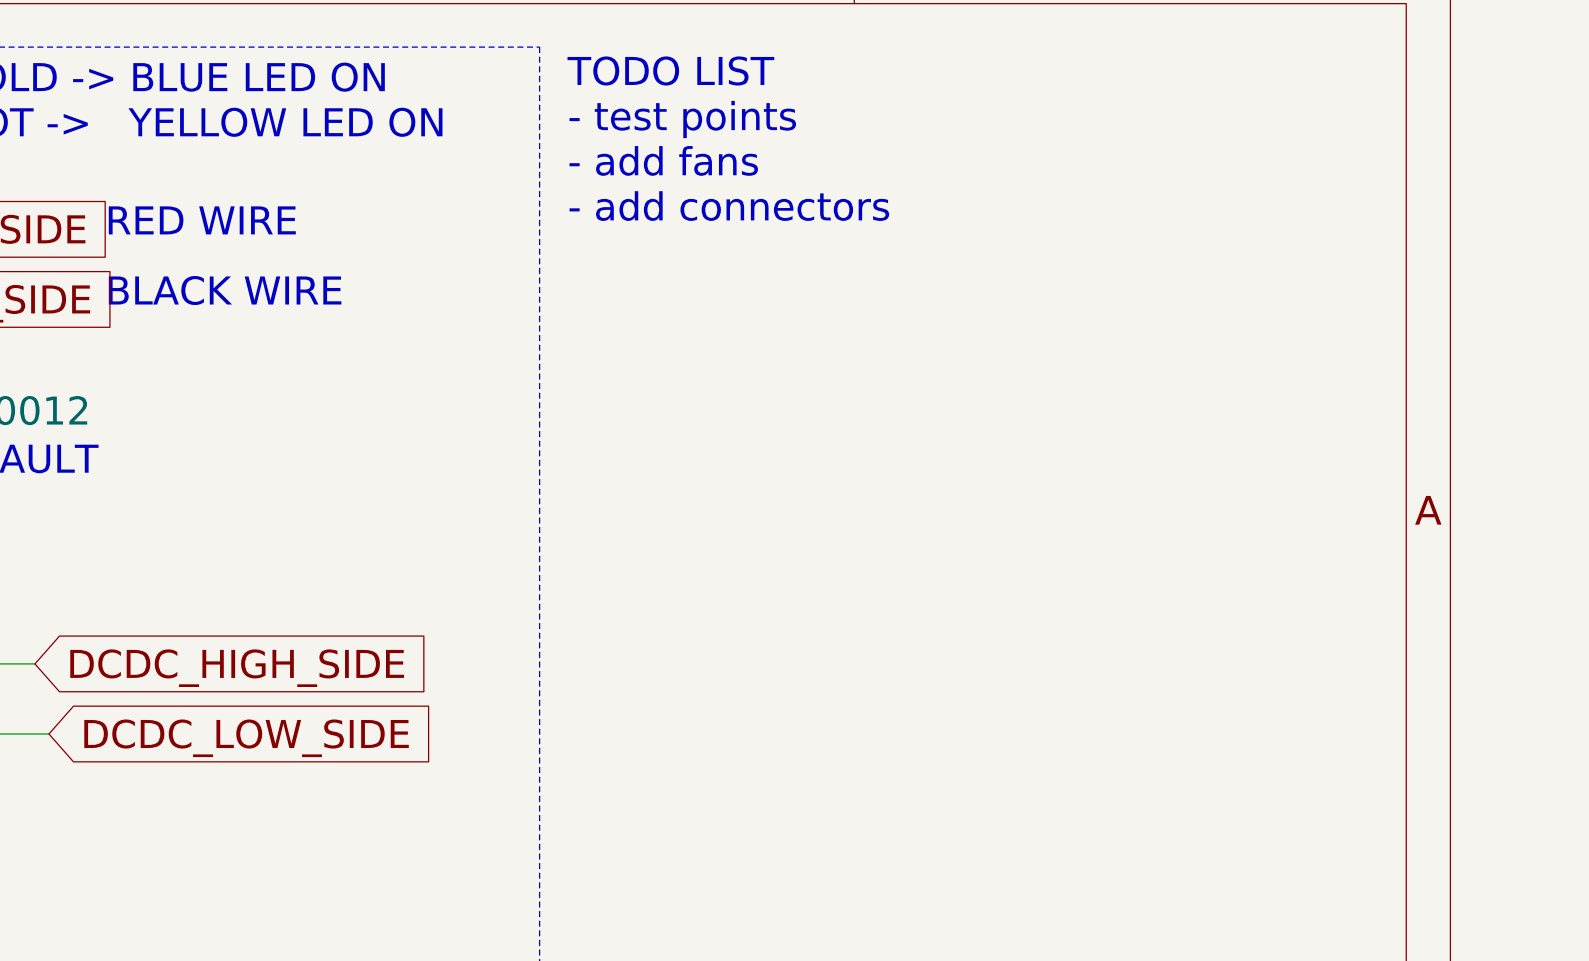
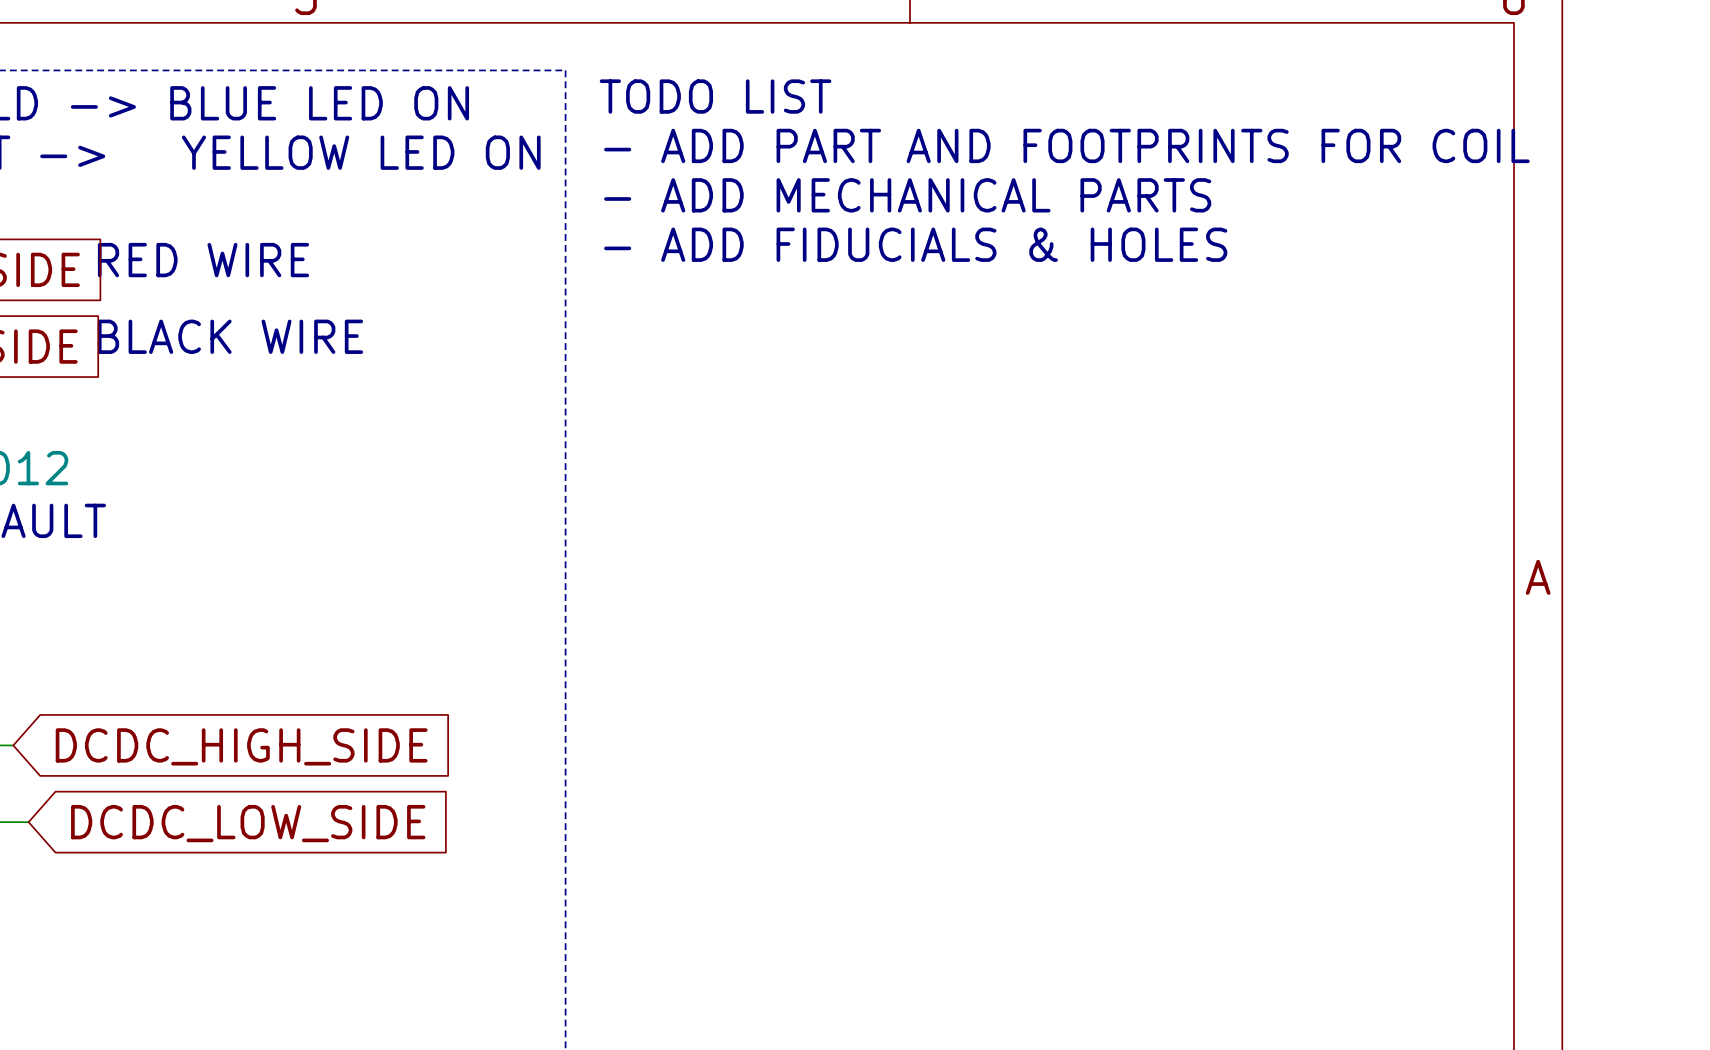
text: - test points (682, 119) -> - ADD PART AND FOOTPRINTS FOR COIL (1066, 145)
text: - add fans (663, 160) -> - ADD MECHANICAL PARTS (907, 195)
text: - add connectors (729, 206) -> - ADD FIDUCIALS & HOLES (915, 244)

